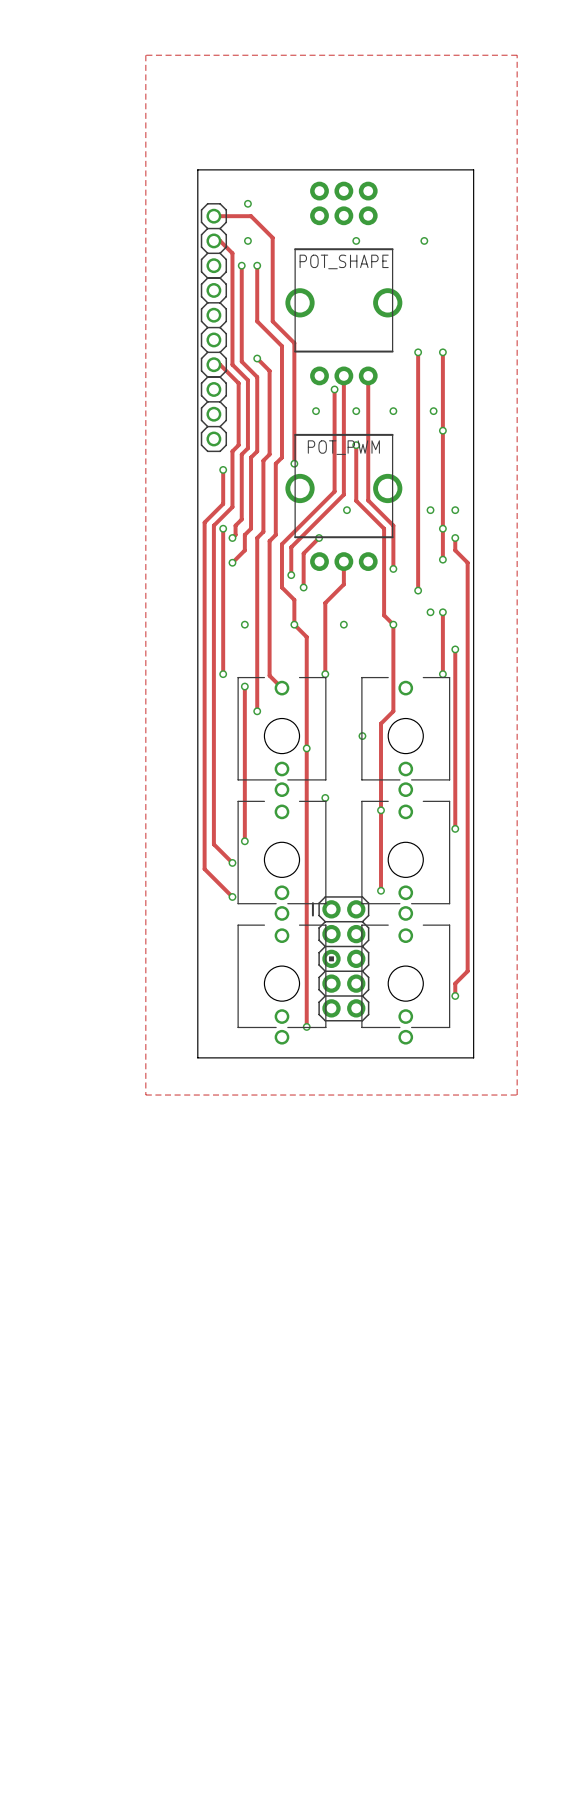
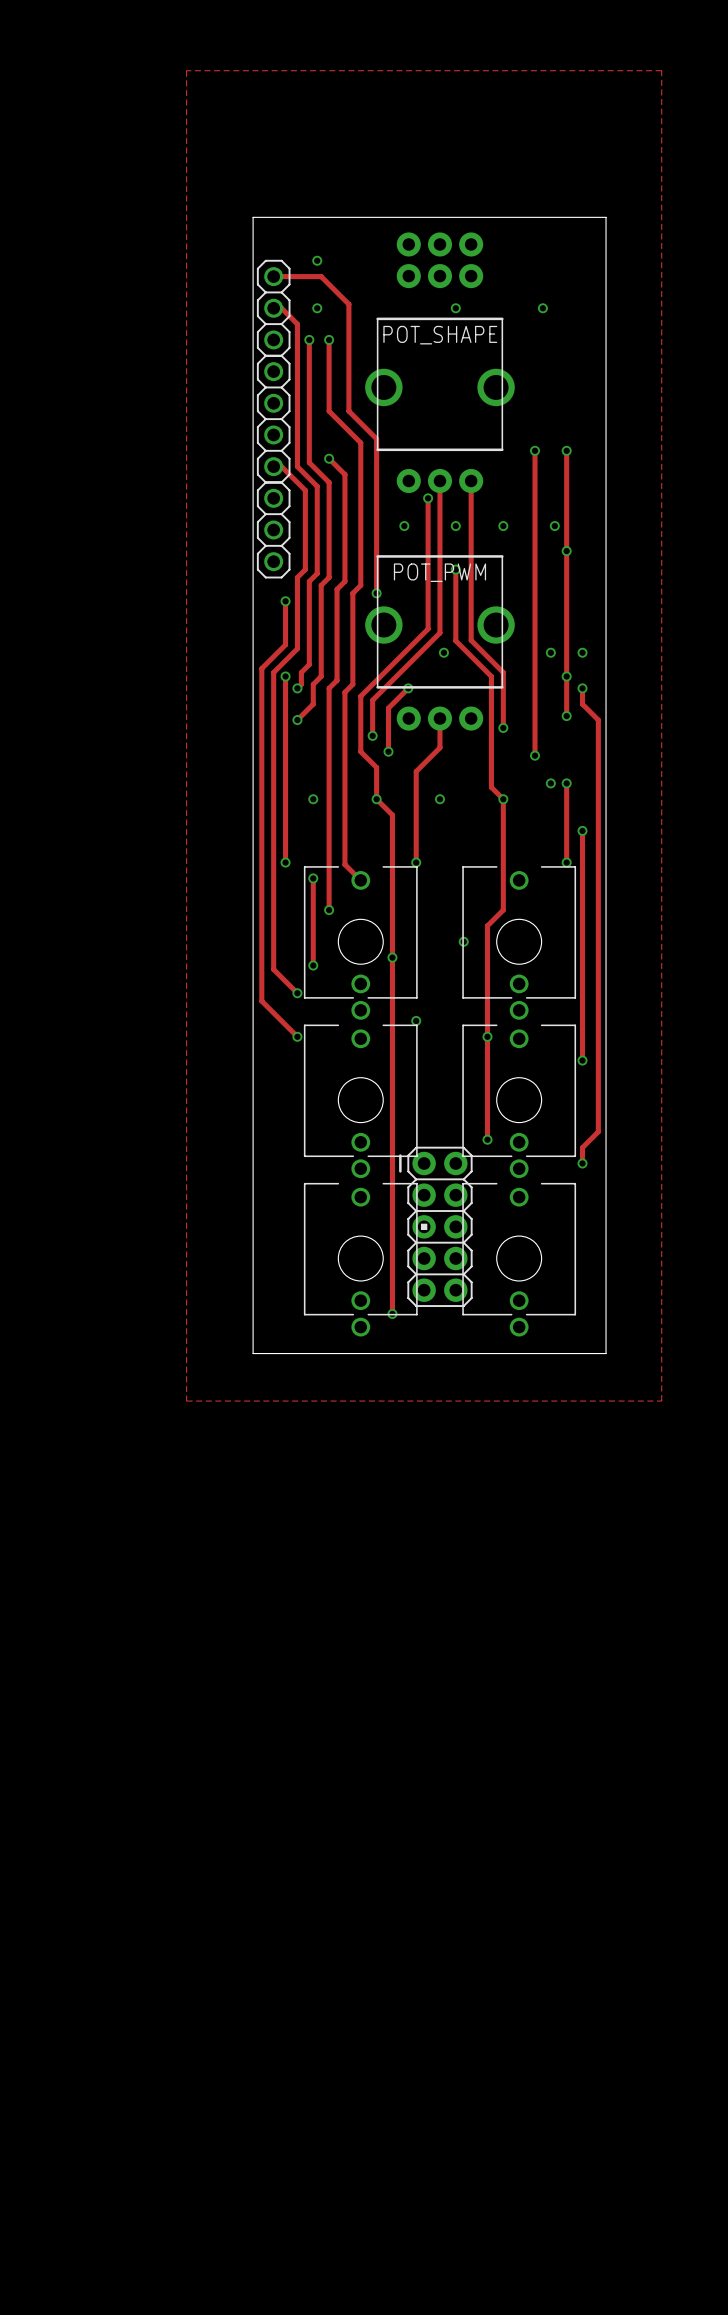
track: (244, 754) (244, 841) -> none
via: none -> (313, 965)
track: (213, 757) (213, 844) (232, 862) -> (273, 969) (297, 993)
via: none -> (297, 993)
track: (204, 782) (204, 869) (232, 896) -> (261, 1001) (297, 1036)
via: none -> (297, 1036)
via: (244, 841) -> none
via: (232, 862) -> none
track: (467, 884) (467, 971) (455, 983) (455, 995) -> (598, 1131) (582, 1147) (582, 1163)
via: (232, 896) -> none
via: none -> (582, 1163)
via: (455, 995) -> none

